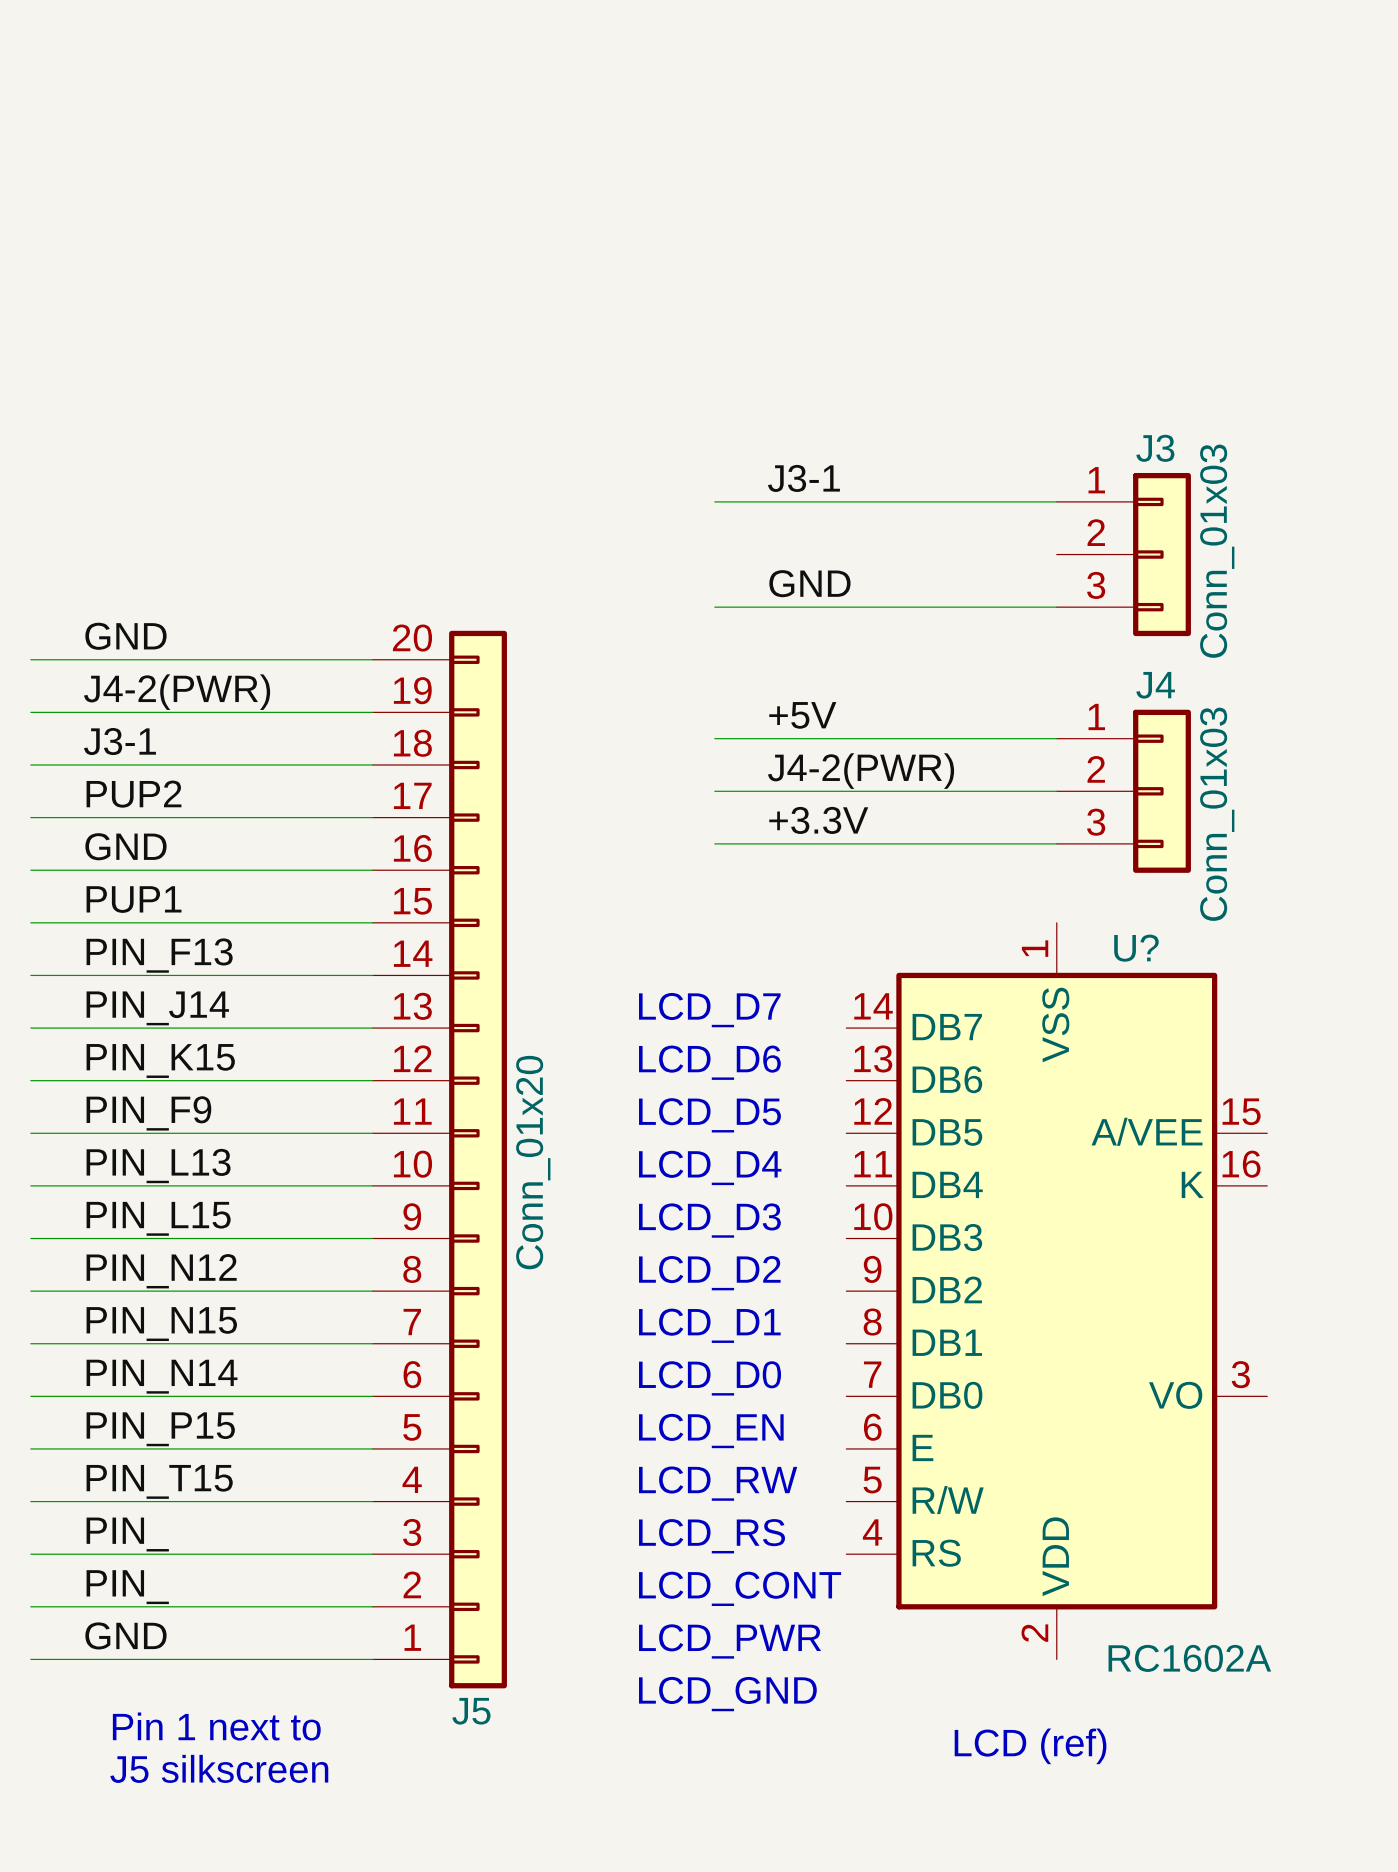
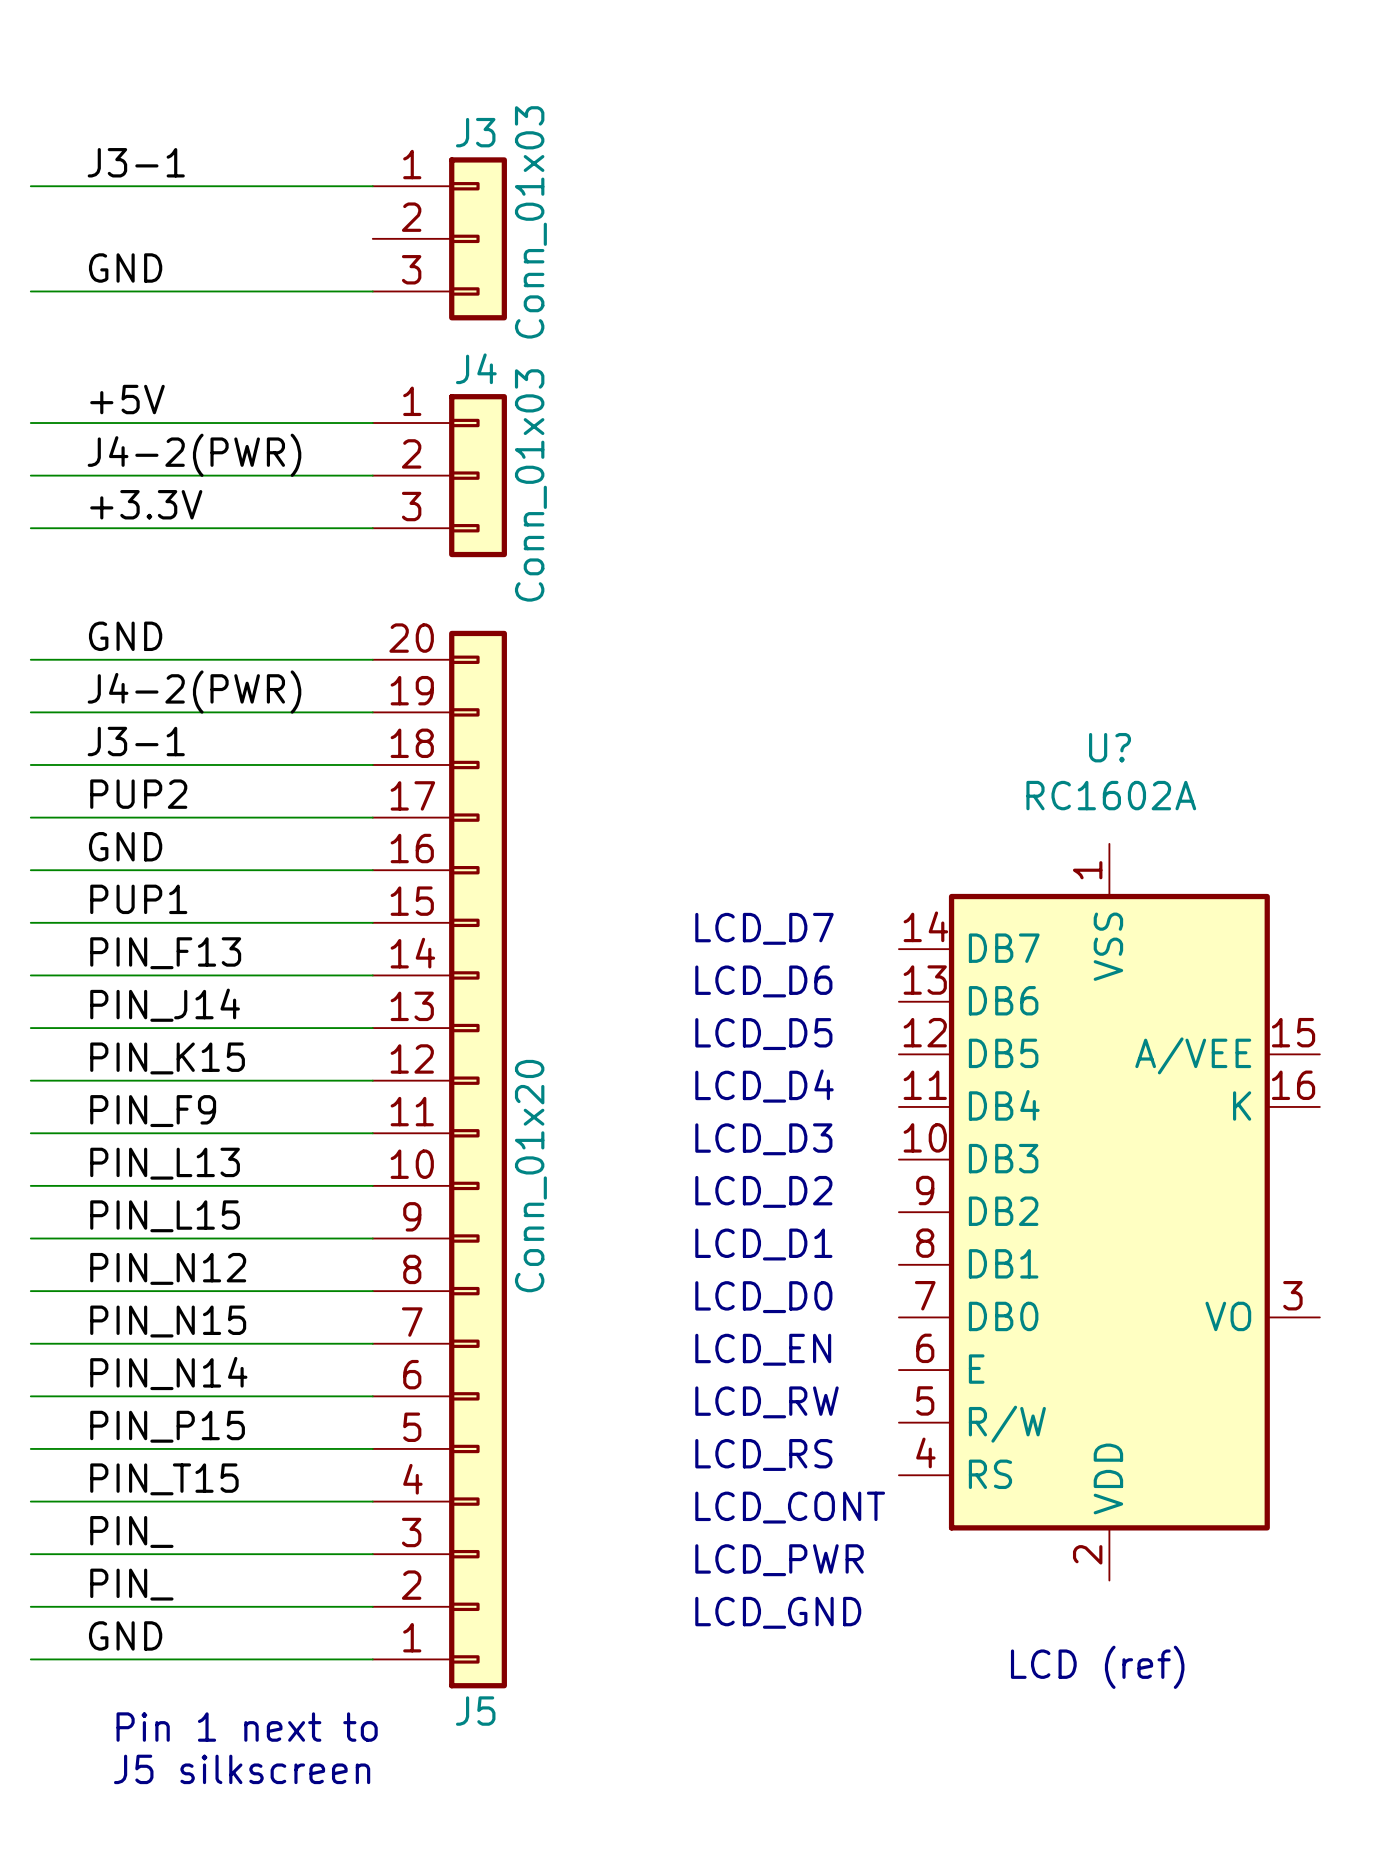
label: none -> J3-1 (136, 162)
wire: none -> (30, 186) (372, 186)
label: none -> GND (125, 267)
wire: none -> (30, 291) (372, 291)
label: none -> +5V (127, 399)
wire: none -> (30, 423) (372, 423)
label: none -> J4-2(PWR) (194, 455)
wire: none -> (30, 475) (372, 475)
label: J3-1 (803, 478) -> none
wire: (714, 501) (1056, 501) -> none
label: none -> +3.3V (146, 504)
wire: none -> (30, 528) (372, 528)
J3 position: (1123, 554) -> (439, 238)
label: GND (809, 583) -> none
wire: (714, 607) (1056, 607) -> none
label: +5V (802, 715) -> none
wire: (714, 738) (1056, 738) -> none
label: J4-2(PWR) (861, 771) -> none
wire: (714, 791) (1056, 791) -> none
J4 position: (1123, 791) -> (439, 475)
label: +3.3V (818, 820) -> none
wire: (714, 843) (1056, 843) -> none
U? name position: U? (1136, 948) -> U? (1110, 747)
text position: LCD_D7 (709, 1010) -> LCD_D7 (764, 928)
text position: LCD_D6 (709, 1062) -> LCD_D6 (763, 981)
text position: LCD_D5 (709, 1115) -> LCD_D5 (763, 1034)
text position: LCD_D4 (710, 1167) -> LCD_D4 (764, 1086)
text position: LCD_D3 (709, 1220) -> LCD_D3 (763, 1139)
text position: LCD_D2 (709, 1273) -> LCD_D2 (763, 1191)
U? position: (1056, 1291) -> (1109, 1212)
text position: LCD_D1 (709, 1325) -> LCD_D1 (763, 1244)
text position: LCD_D0 (710, 1378) -> LCD_D0 (763, 1297)
text position: LCD_EN (711, 1431) -> LCD_EN (763, 1349)
text position: LCD_RW (718, 1483) -> LCD_RW (766, 1402)
text position: LCD_RS (712, 1536) -> LCD_RS (763, 1454)
text position: LCD_CONT (740, 1588) -> LCD_CONT (790, 1507)
text position: LCD_PWR (730, 1641) -> LCD_PWR (779, 1560)
U? value position: RC1602A (1189, 1658) -> RC1602A (1111, 795)
text position: LCD_GND (727, 1694) -> LCD_GND (778, 1612)
text position: LCD (ref) (1030, 1746) -> LCD (ref) (1097, 1667)

